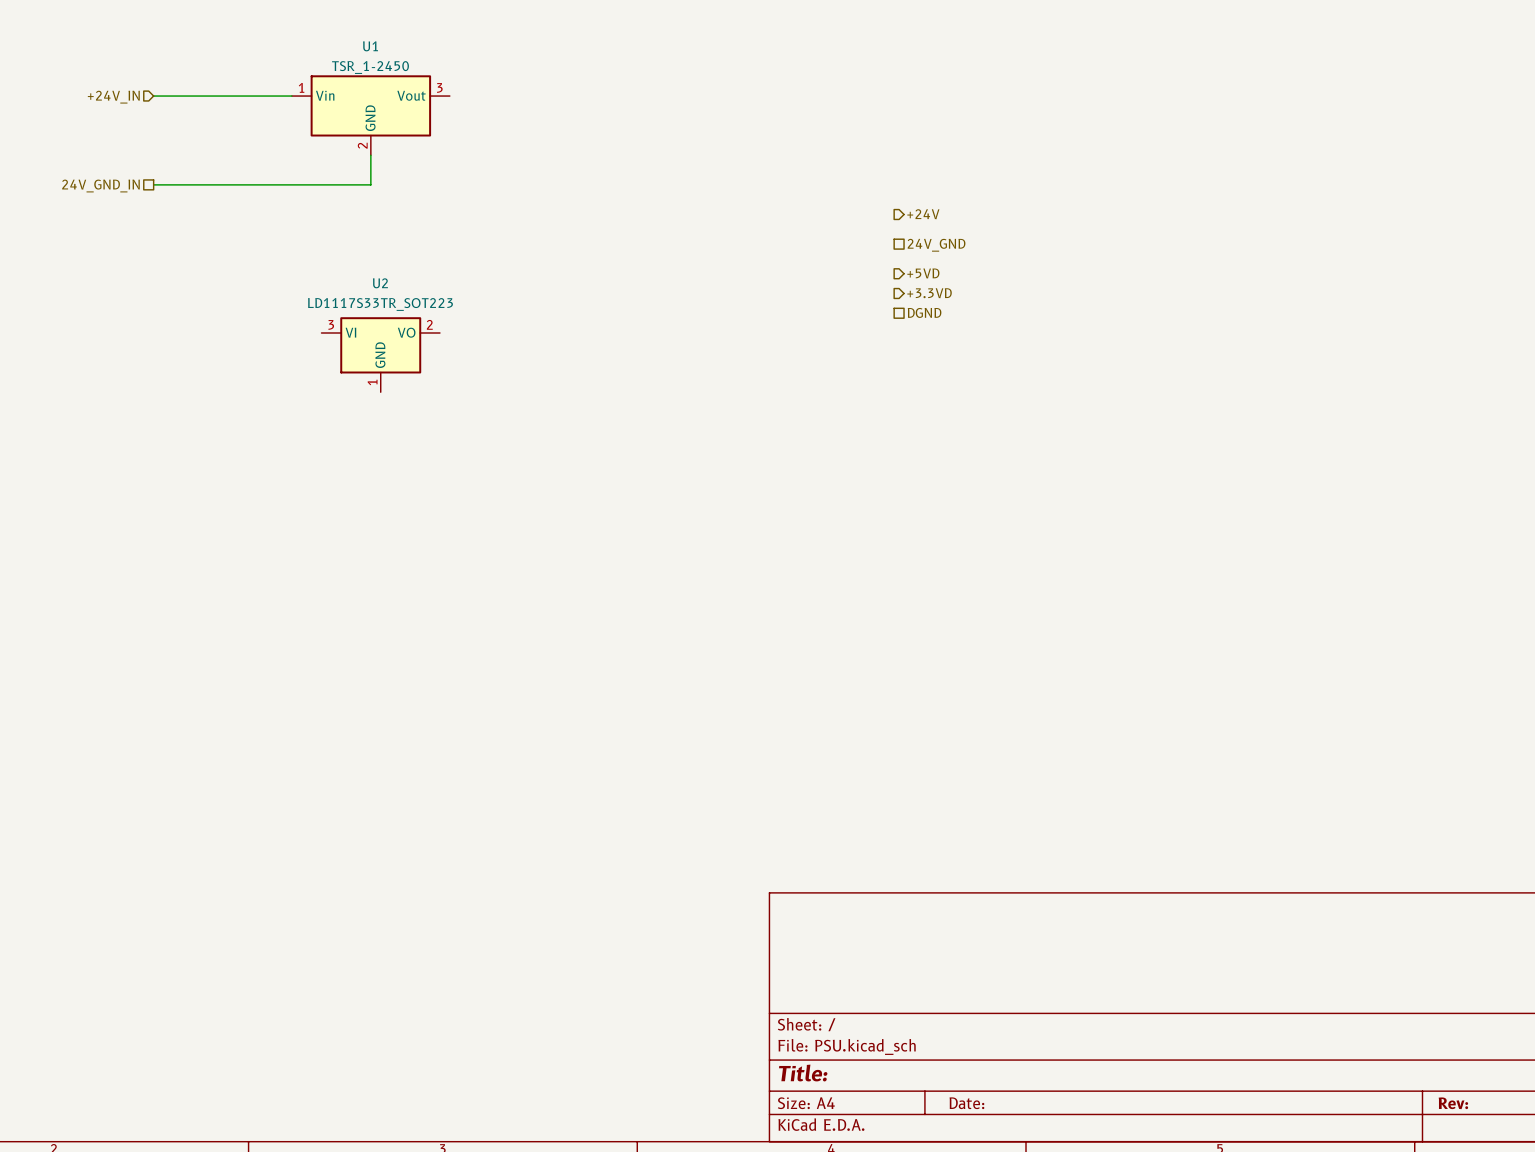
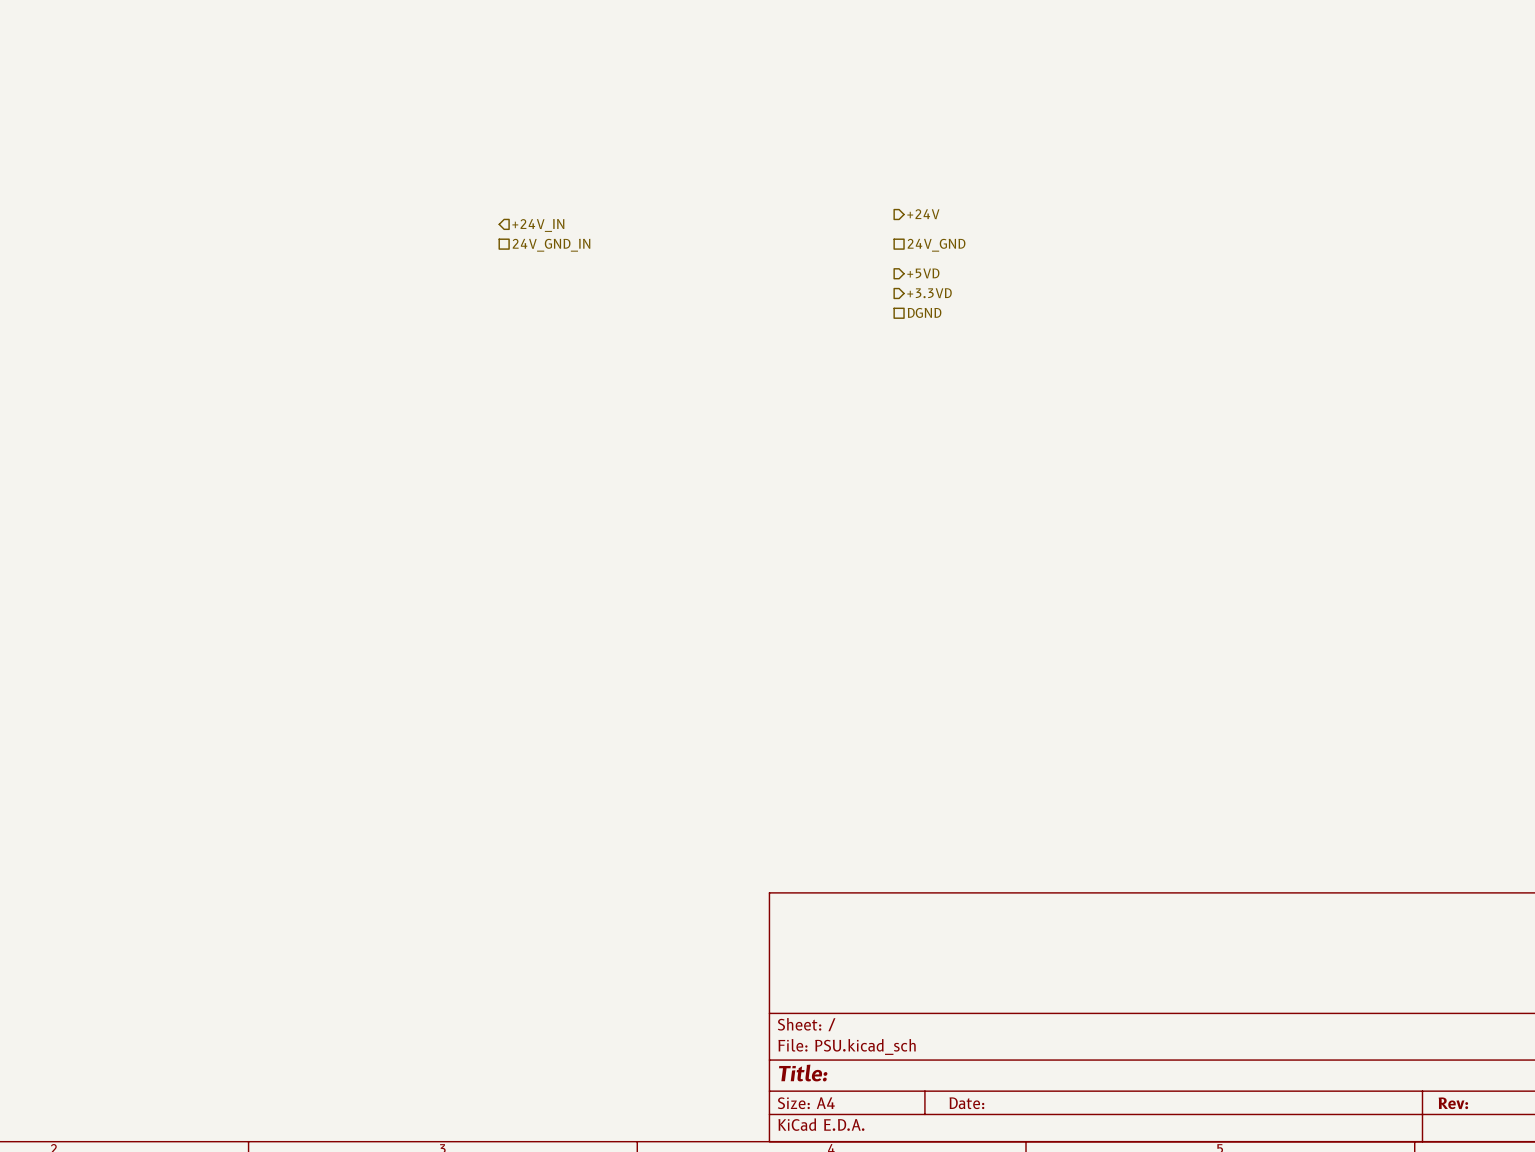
wire: (153, 96) (291, 96) -> none
hierarchical label: +24V_IN (113, 97) -> none
U1: TSR_1-2450 (370, 115) -> none
wire: (370, 155) (370, 184) (153, 184) -> none
hierarchical label: 24V_GND_IN (100, 186) -> none
hierarchical label: none -> +24V_IN (538, 225)
hierarchical label: none -> 24V_GND_IN (551, 245)
U2: LD1117S33TR_SOT223 (380, 354) -> none

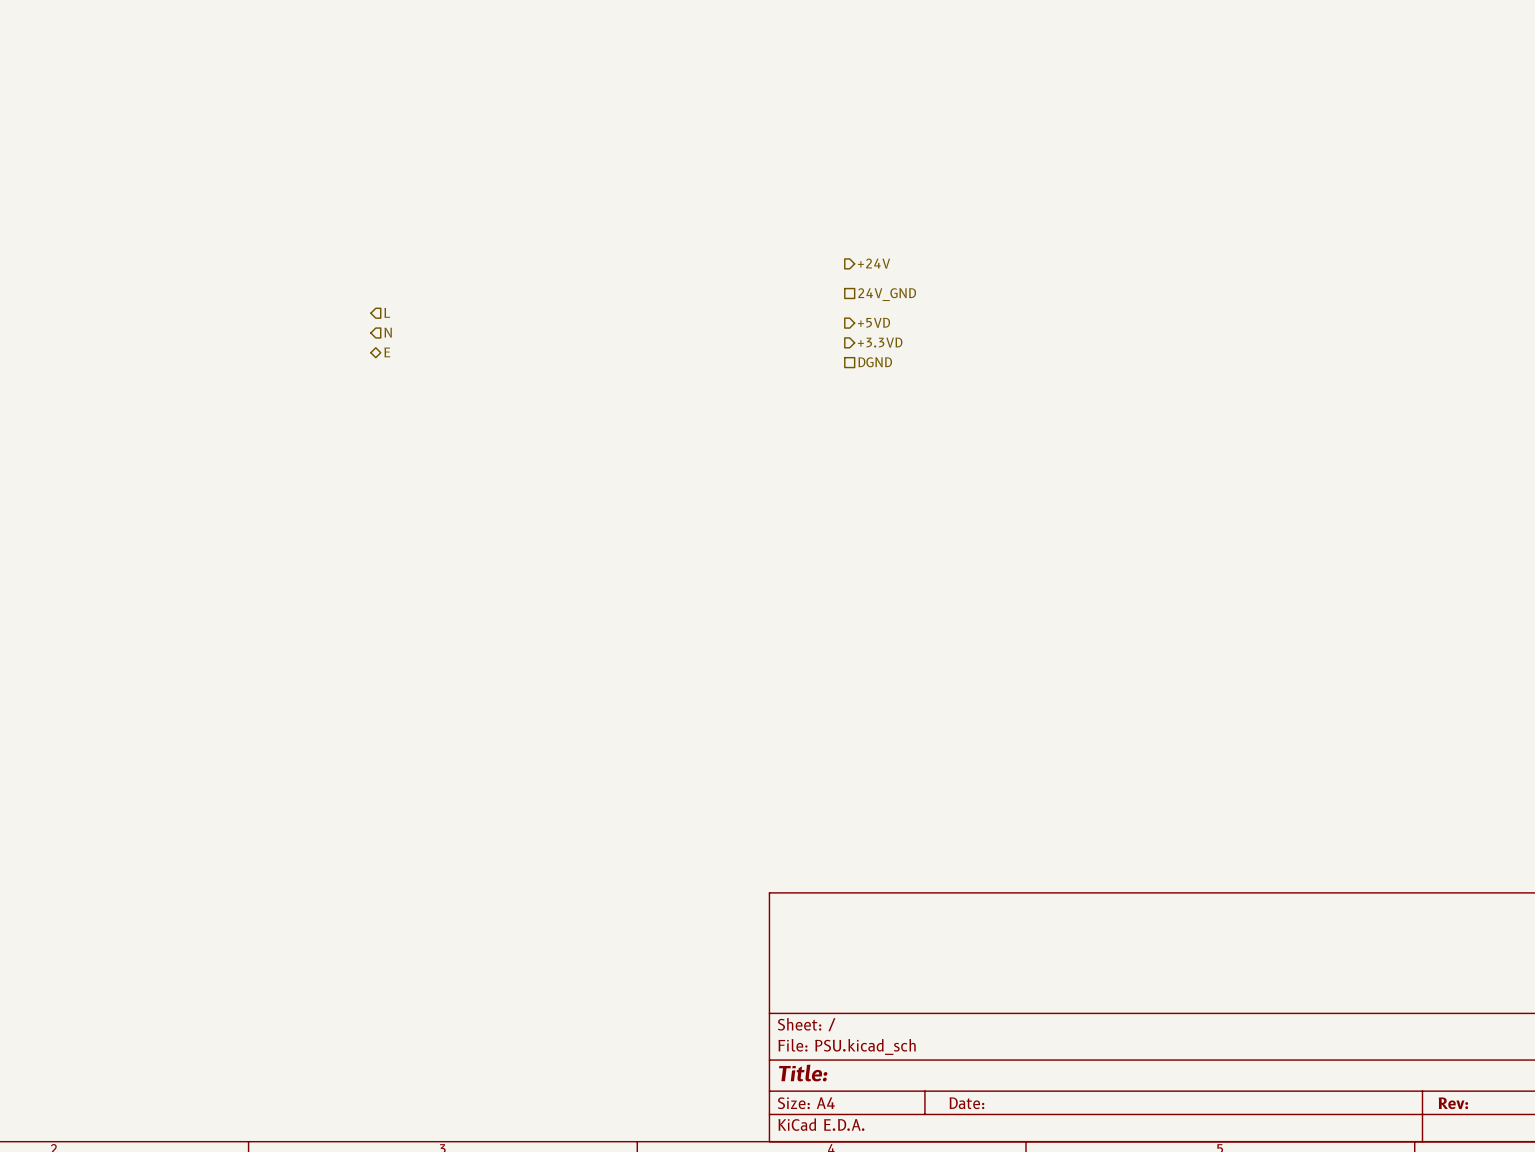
hierarchical label position: +24V (923, 214) -> +24V (874, 263)
hierarchical label: +24V_IN (538, 225) -> none
hierarchical label: 24V_GND_IN (551, 245) -> none
hierarchical label position: 24V_GND (936, 245) -> 24V_GND (887, 294)
hierarchical label position: +5VD (923, 273) -> +5VD (874, 322)
hierarchical label position: +3.3VD (929, 293) -> +3.3VD (880, 342)
hierarchical label: none -> L (387, 312)
hierarchical label position: DGND (924, 312) -> DGND (875, 362)
hierarchical label: none -> N (388, 332)
hierarchical label: none -> E (387, 352)

